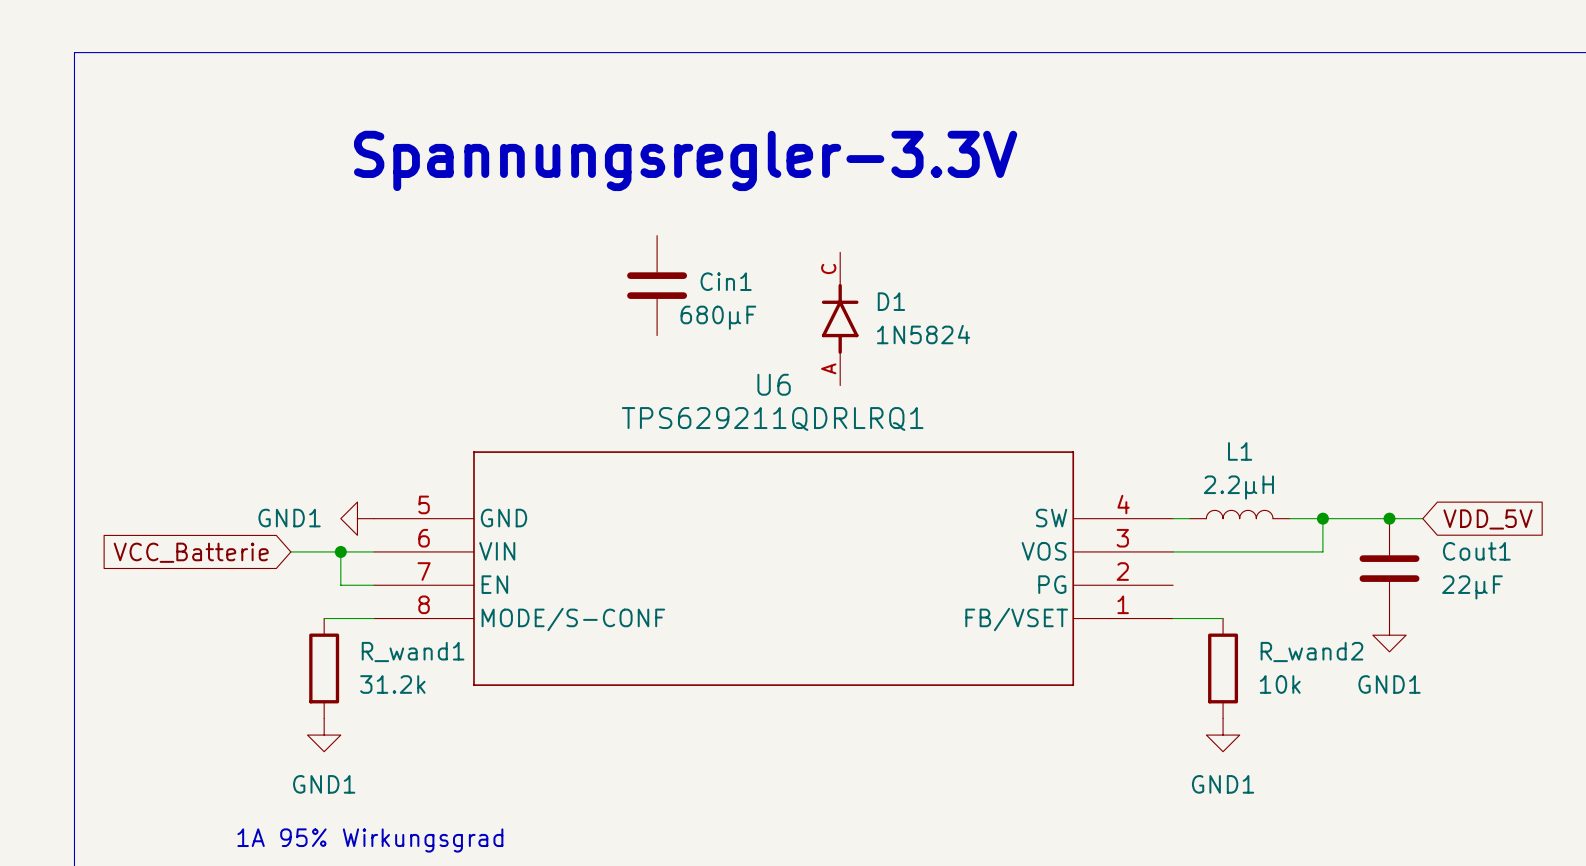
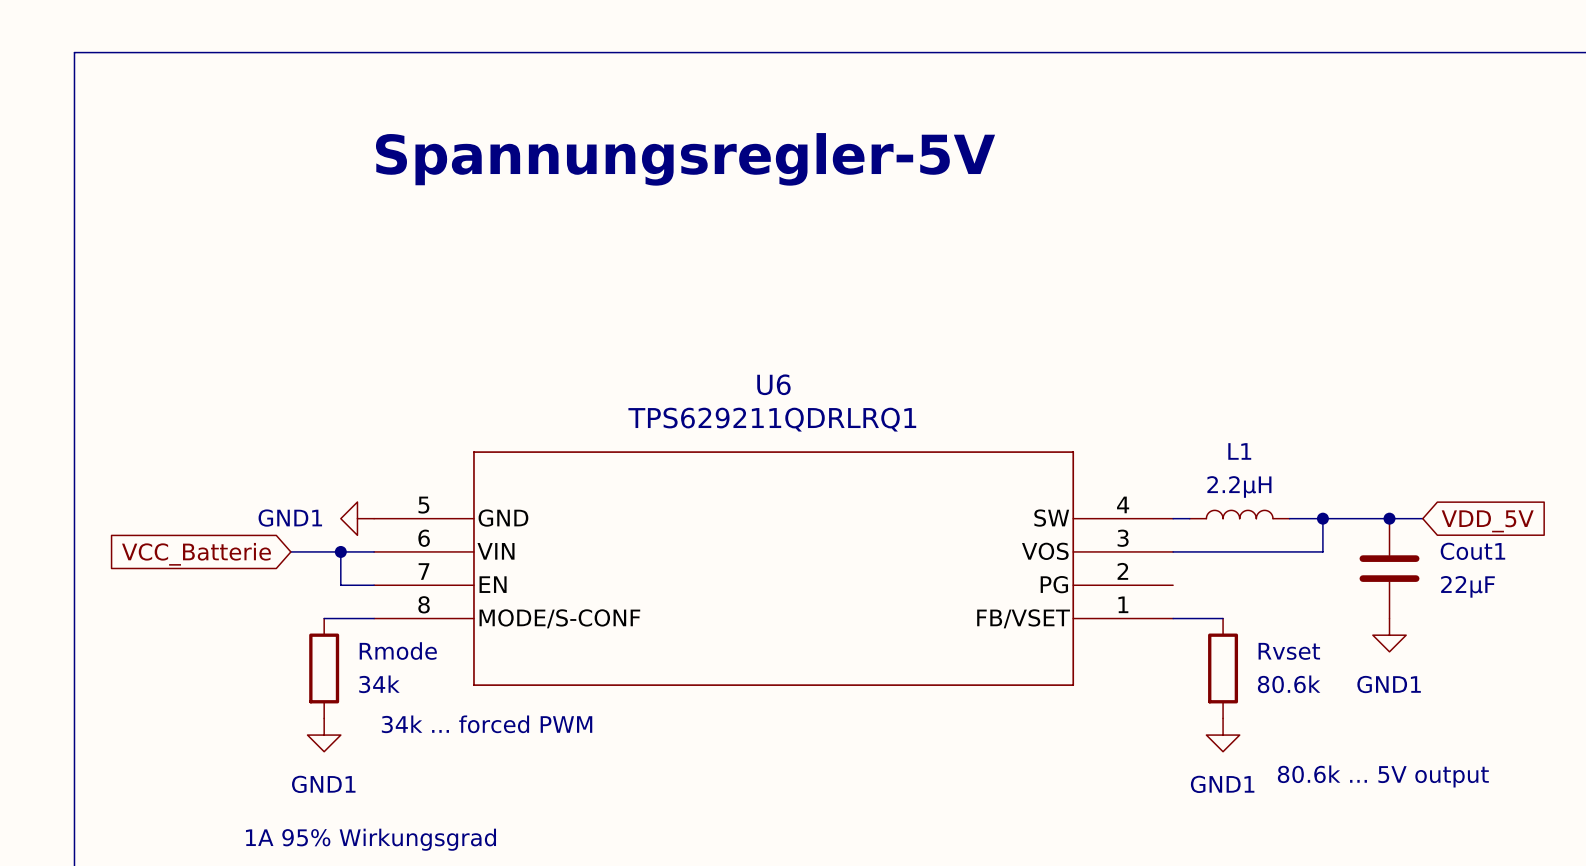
text: Spannungsregler-3.3V (685, 160) -> Spannungsregler-5V (685, 159)
Cin1: 680µF (657, 285) -> none
D1: 1N5824 (840, 318) -> none
R_wand1 name: R_wand1 (413, 652) -> Rmode (398, 651)
R_wand2 name: R_wand2 (1311, 652) -> Rvset (1289, 651)
R_wand1 value: 31.2k (392, 684) -> 34k (379, 684)
R_wand2 value: 10k (1280, 684) -> 80.6k (1289, 684)
text: none -> 34k ... forced PWM (487, 724)
text: none -> 80.6k ... 5V output (1383, 776)

